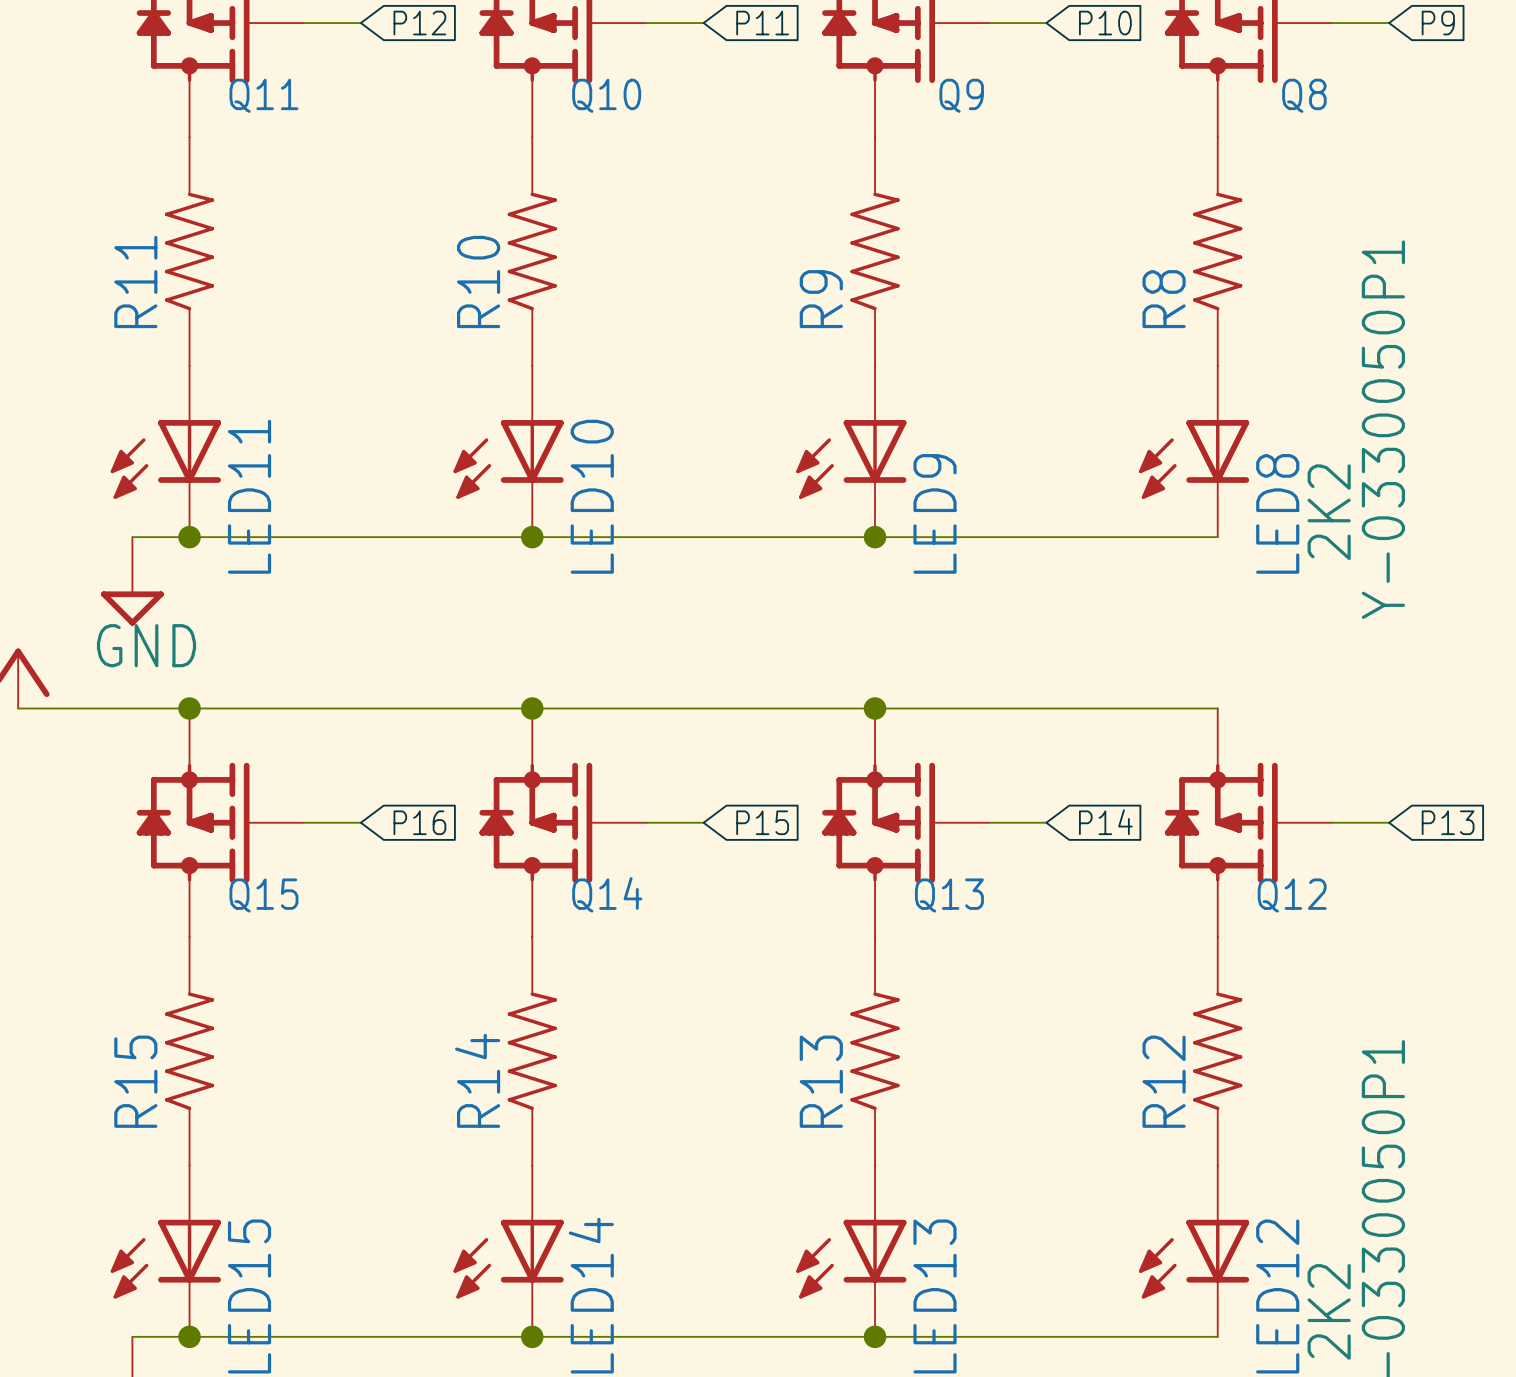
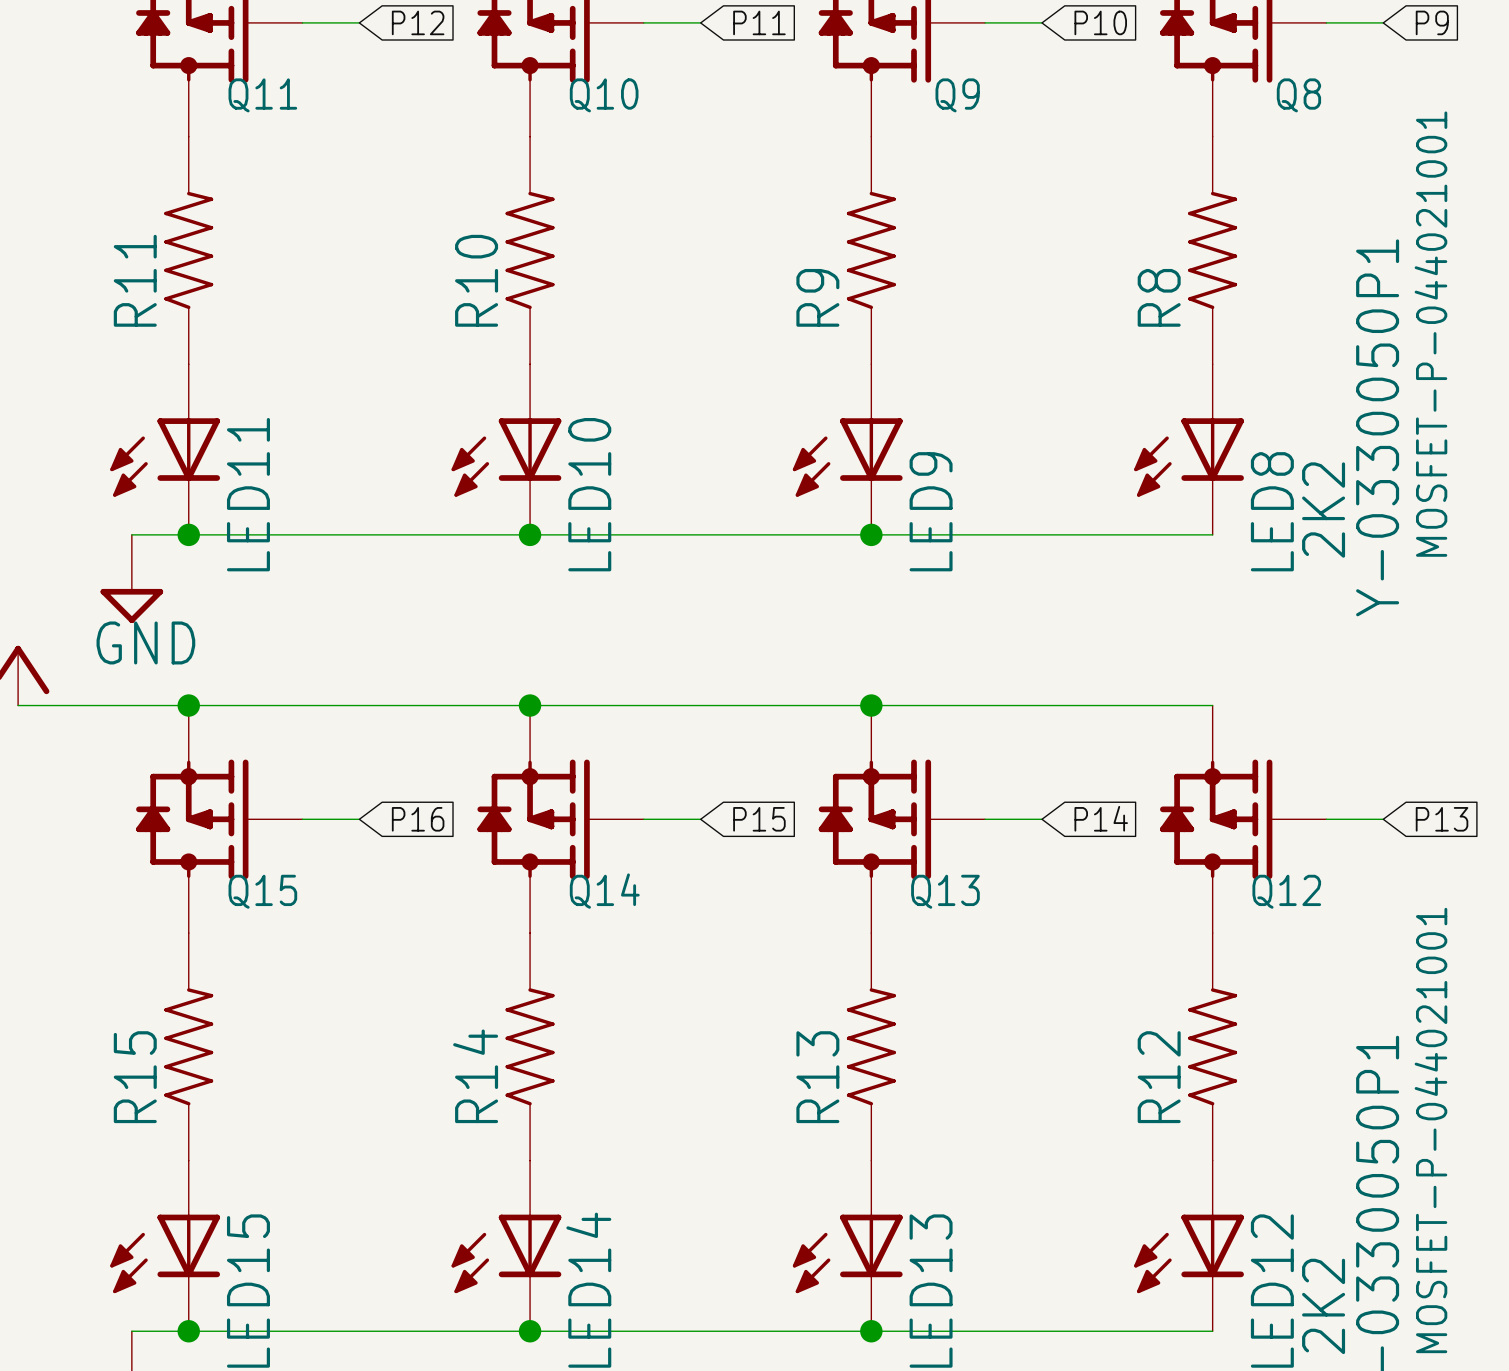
Q8 value: none -> MOSFET-P-044021001 (1430, 334)
Q12 value: none -> MOSFET-P-044021001 (1430, 1130)

